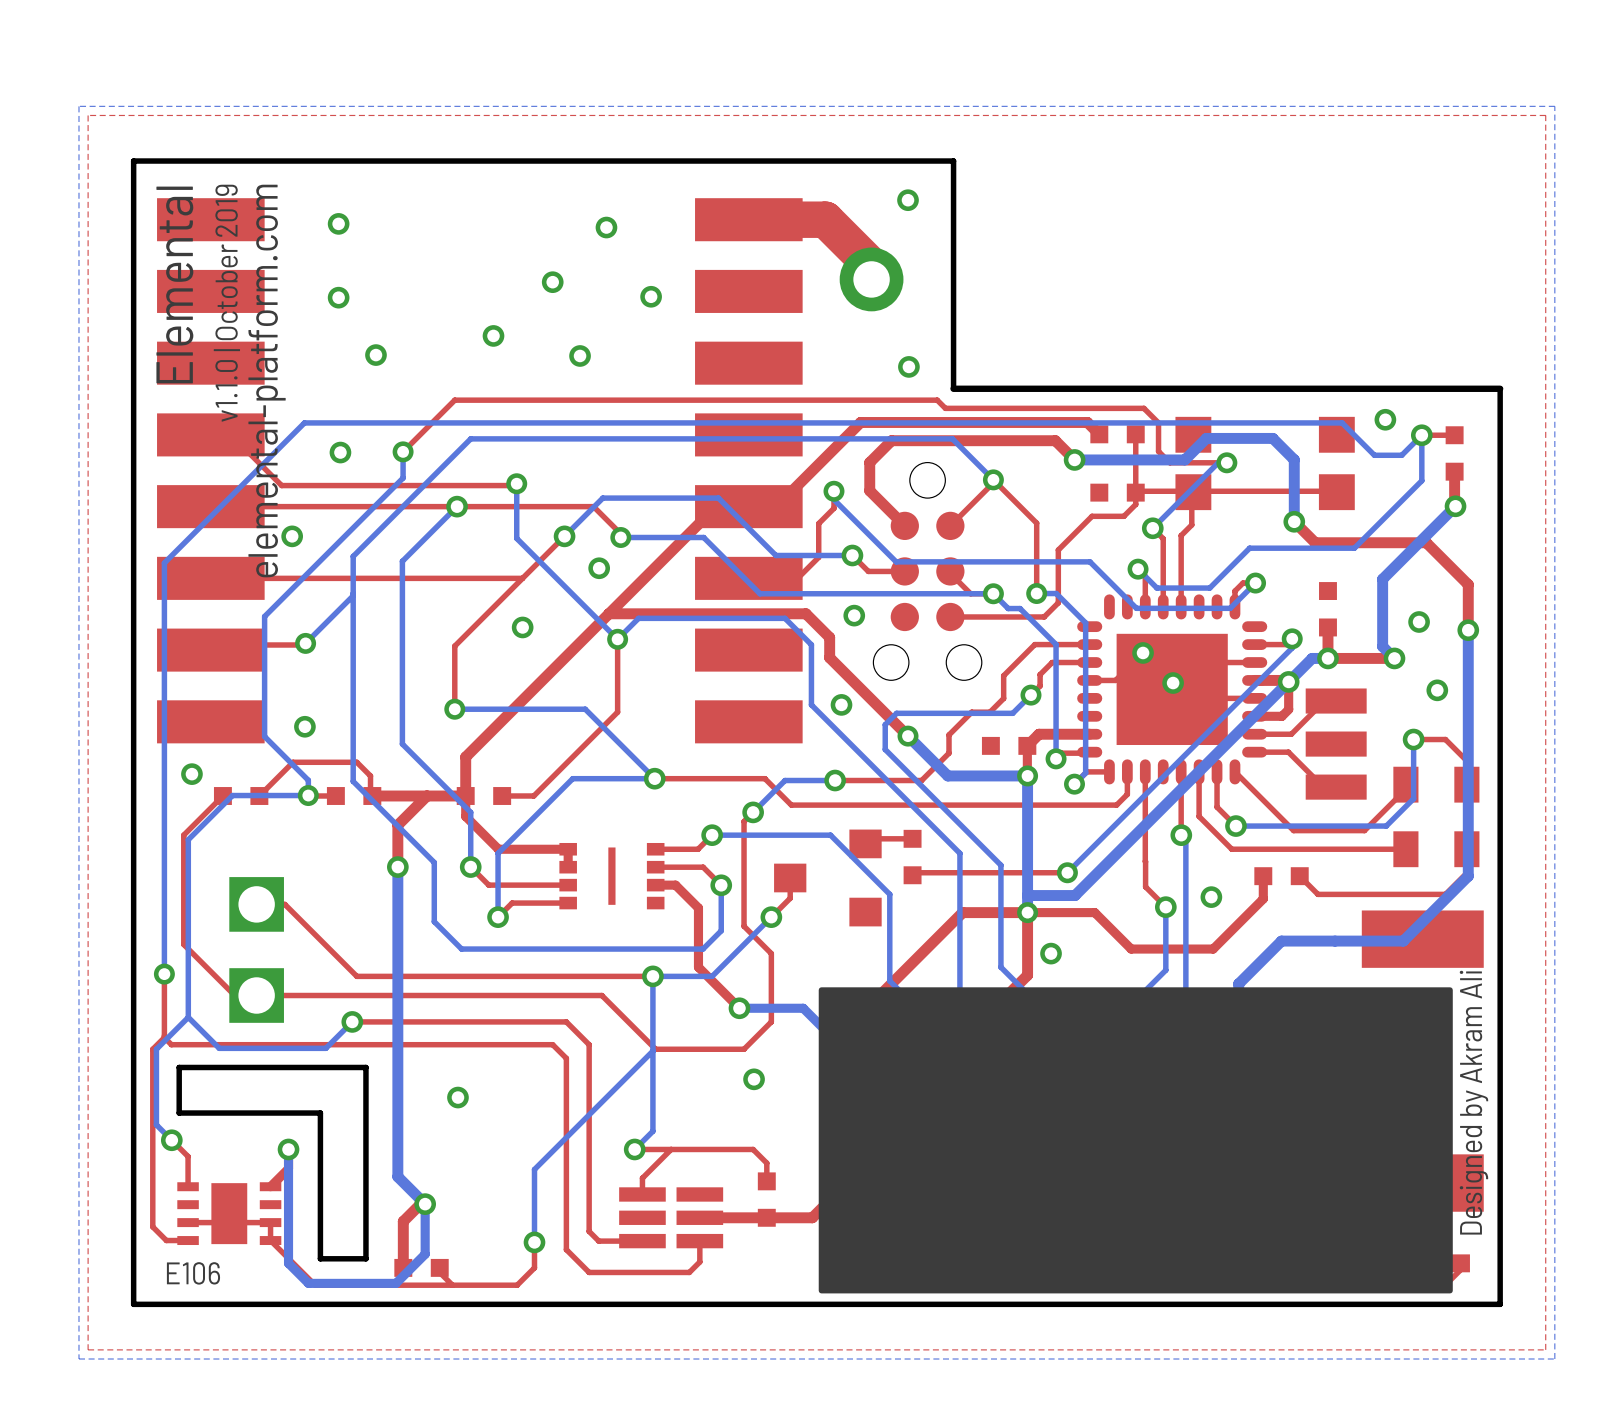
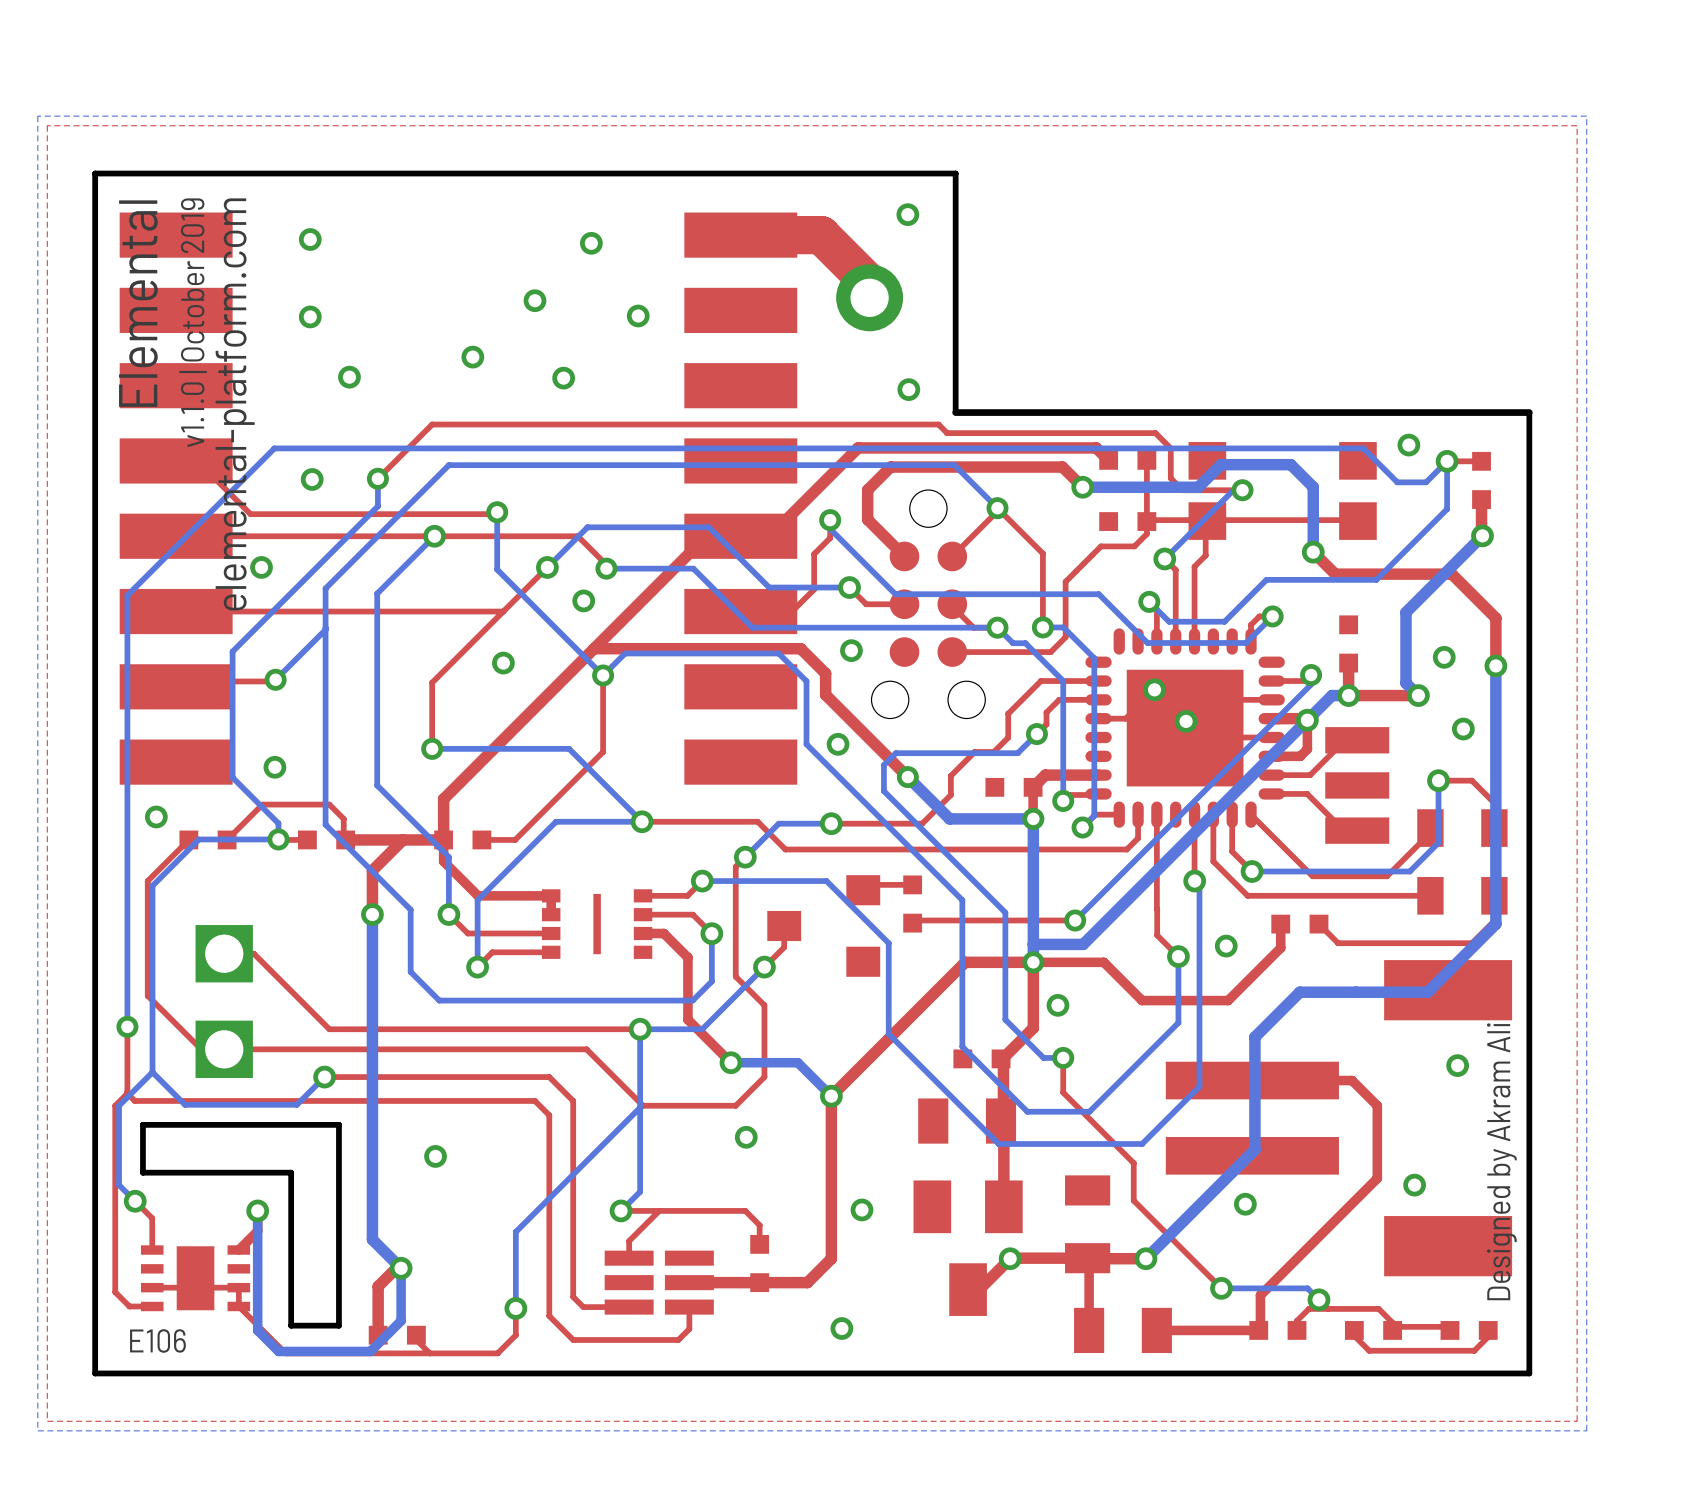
drawing: [818, 987, 1453, 1294] -> none

